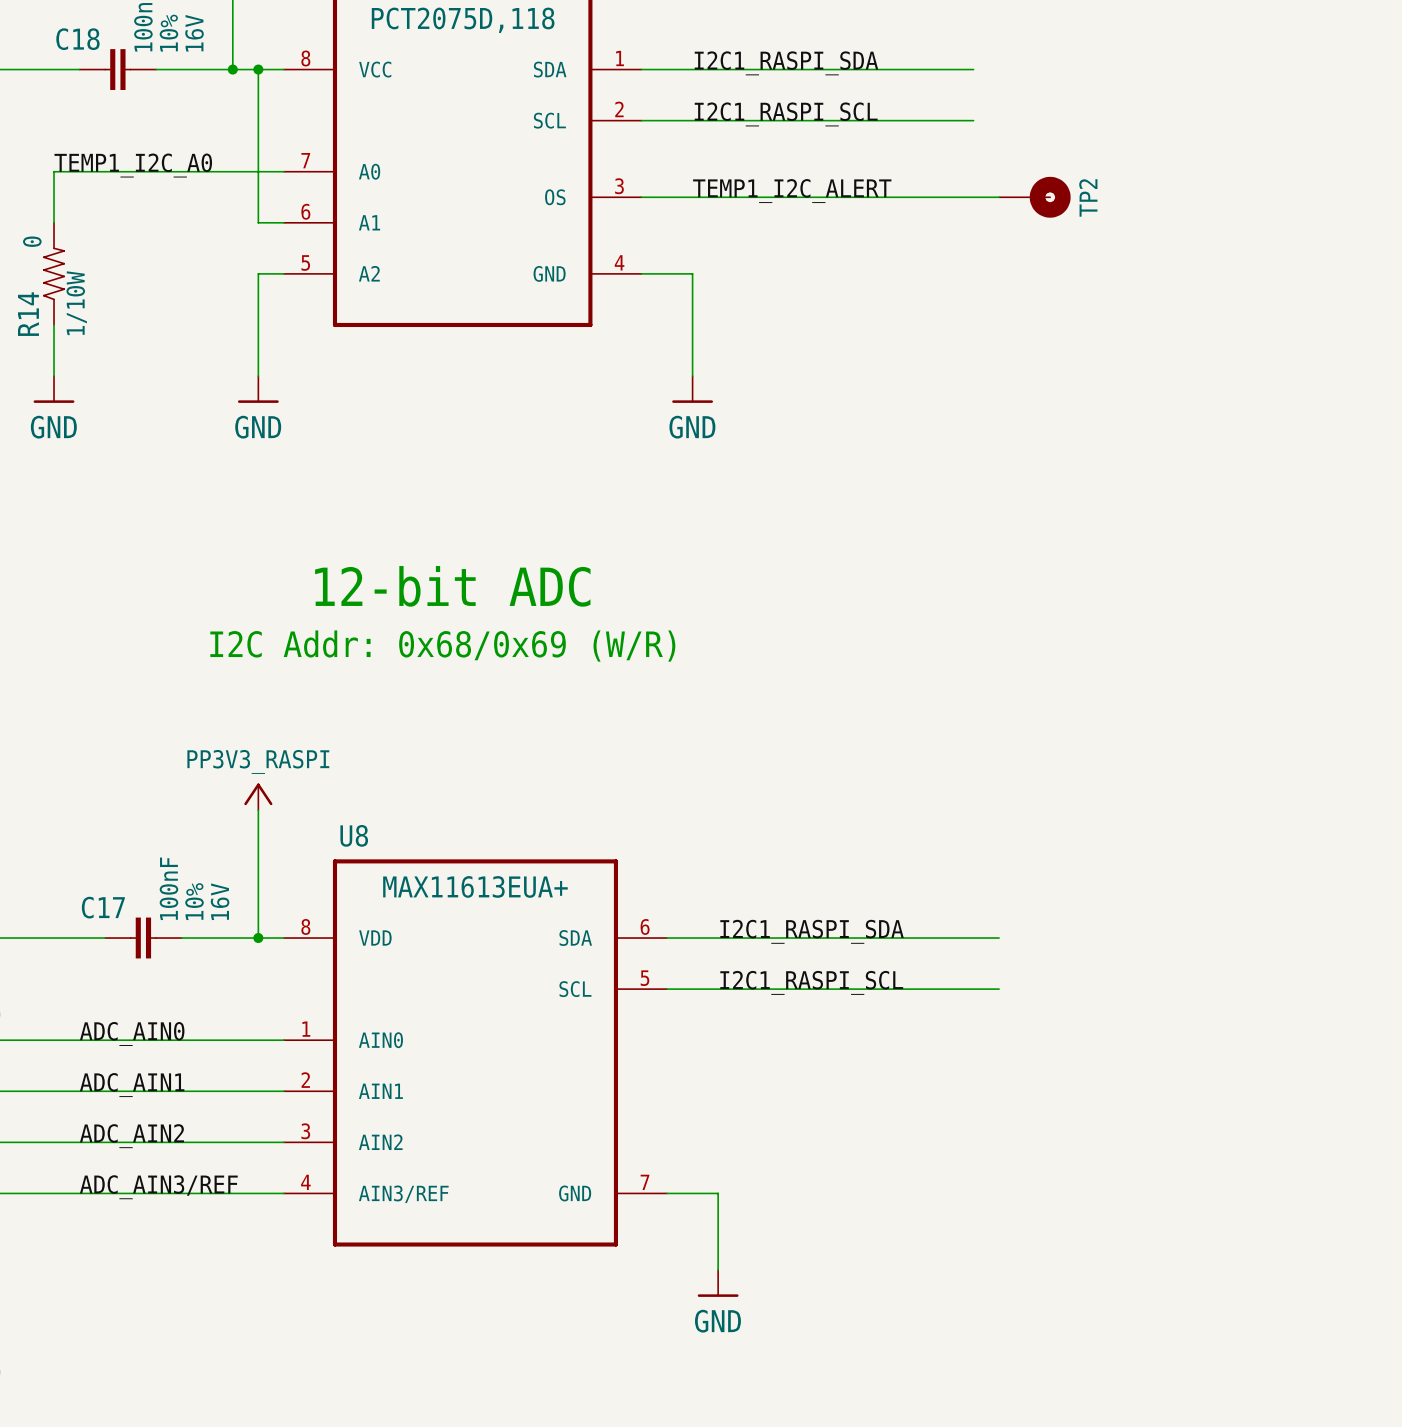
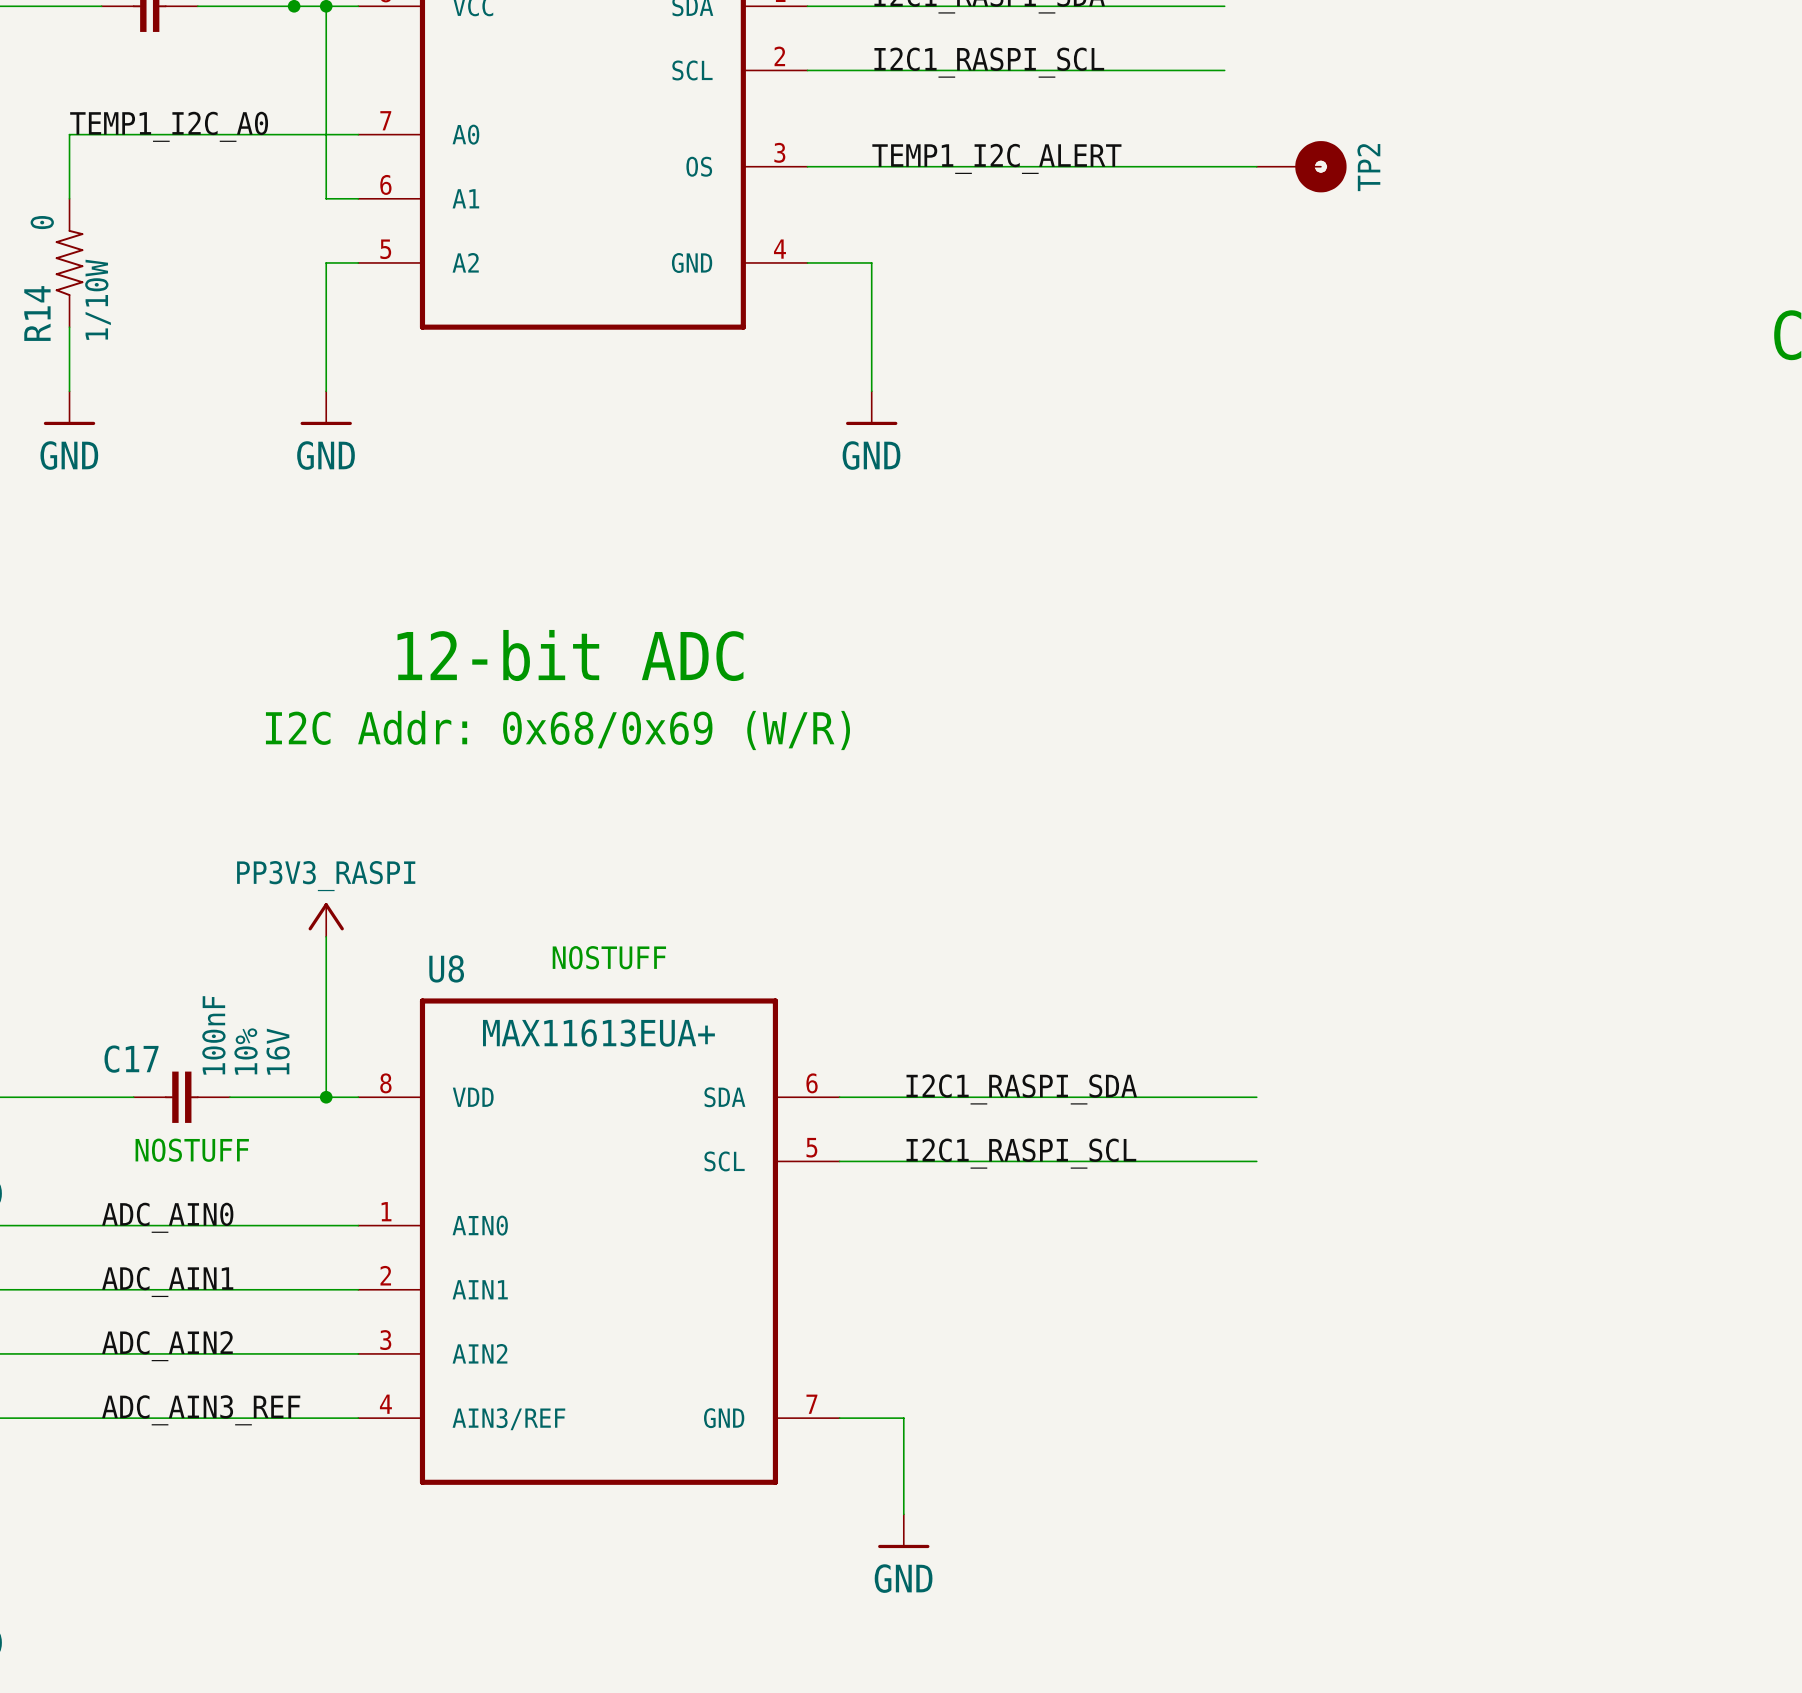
text: none -> NOSTUFF (609, 957)
text: none -> NOSTUFF (192, 1150)
label: ADC_AIN3/REF (158, 1187) -> ADC_AIN3_REF (201, 1410)

